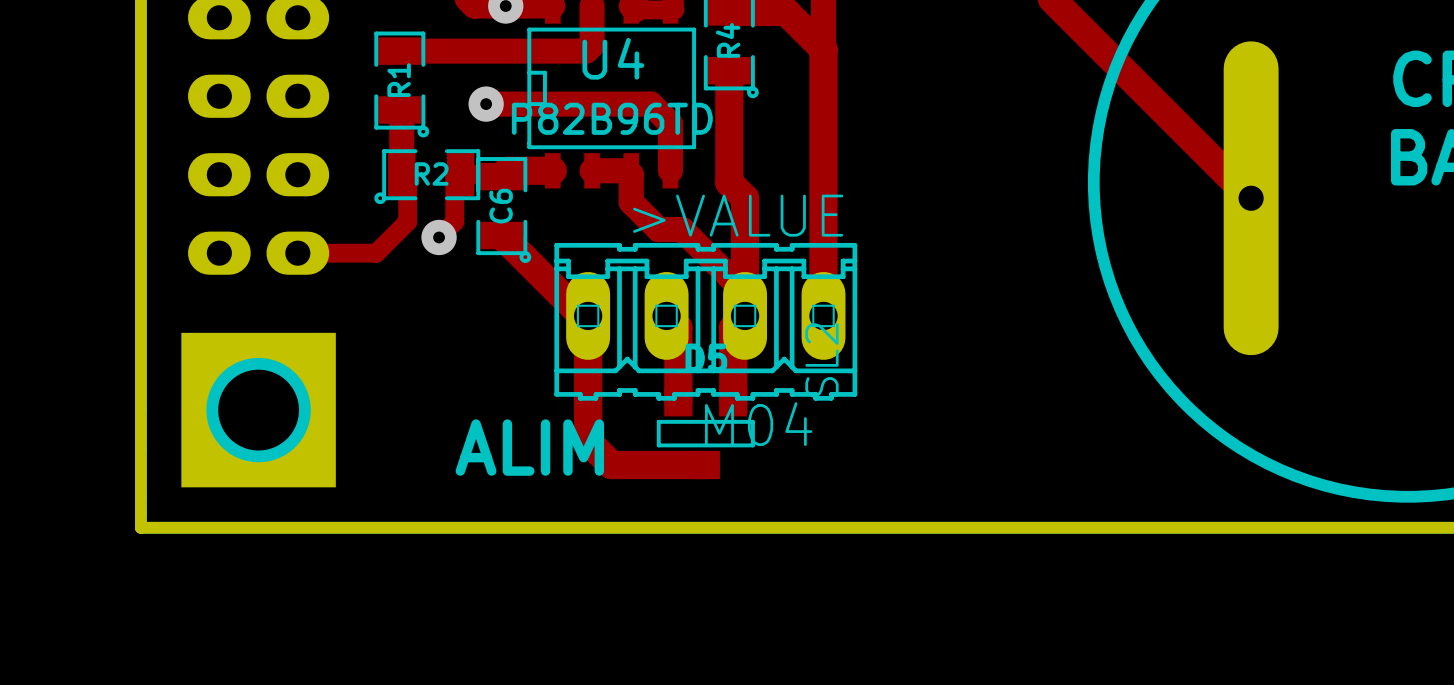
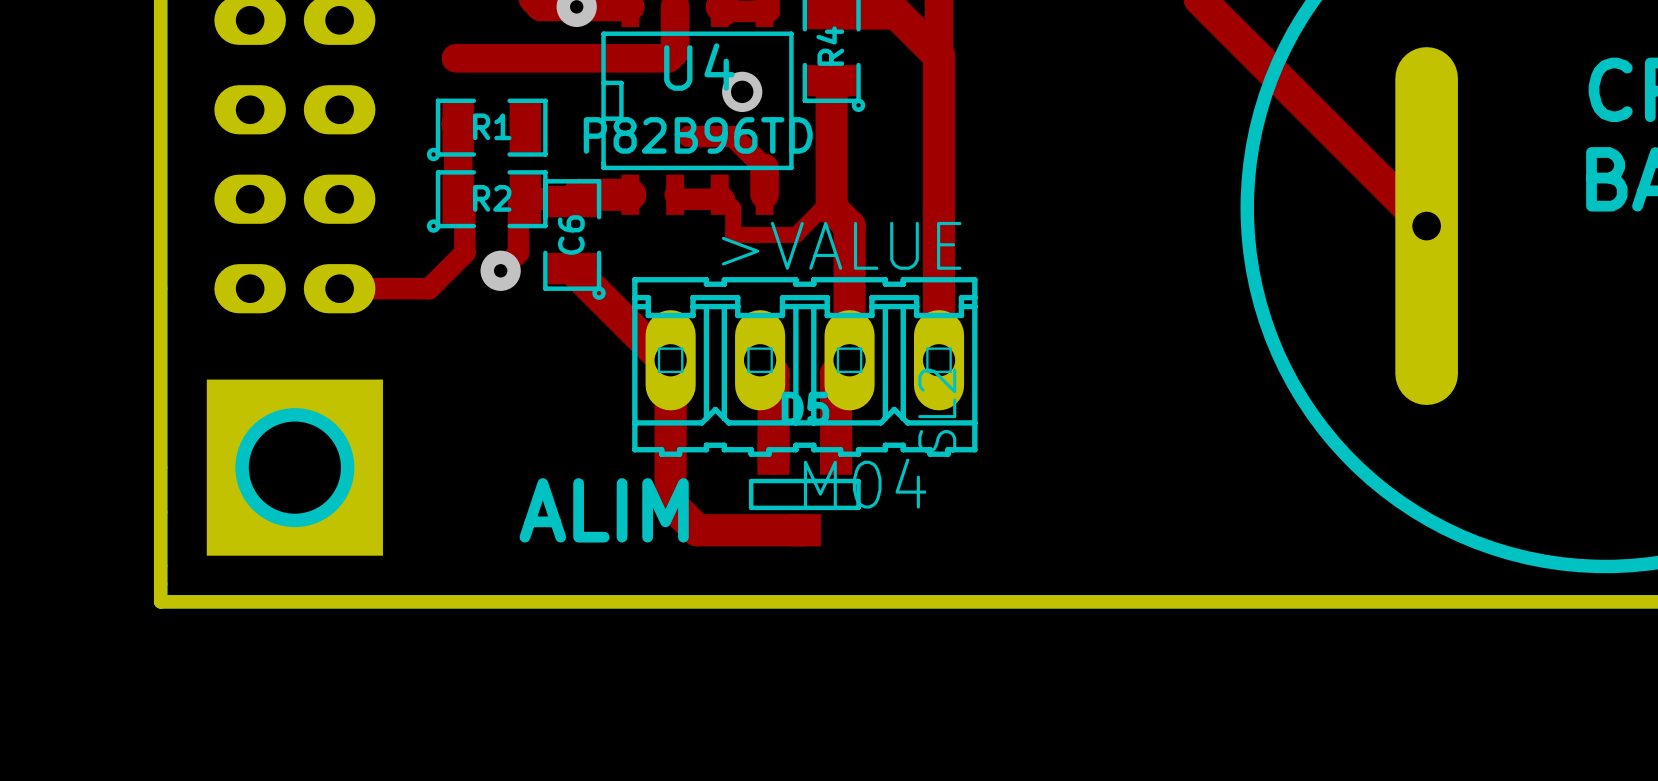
via: none -> (742, 91)
R1 rotation: 0° (401, 84) -> 90° clockwise (487, 129)
track: (486, 104) (650, 104) (670, 123) (670, 147) -> (688, 136) (733, 136) (764, 167)
via: (486, 104) -> none
track: (592, 170) (627, 170) (631, 174) (631, 202) (658, 229) (682, 229) (745, 292) (745, 315) -> (675, 194) (679, 199) (724, 199) (719, 194) (733, 208) (733, 235) (795, 235) (831, 199)

